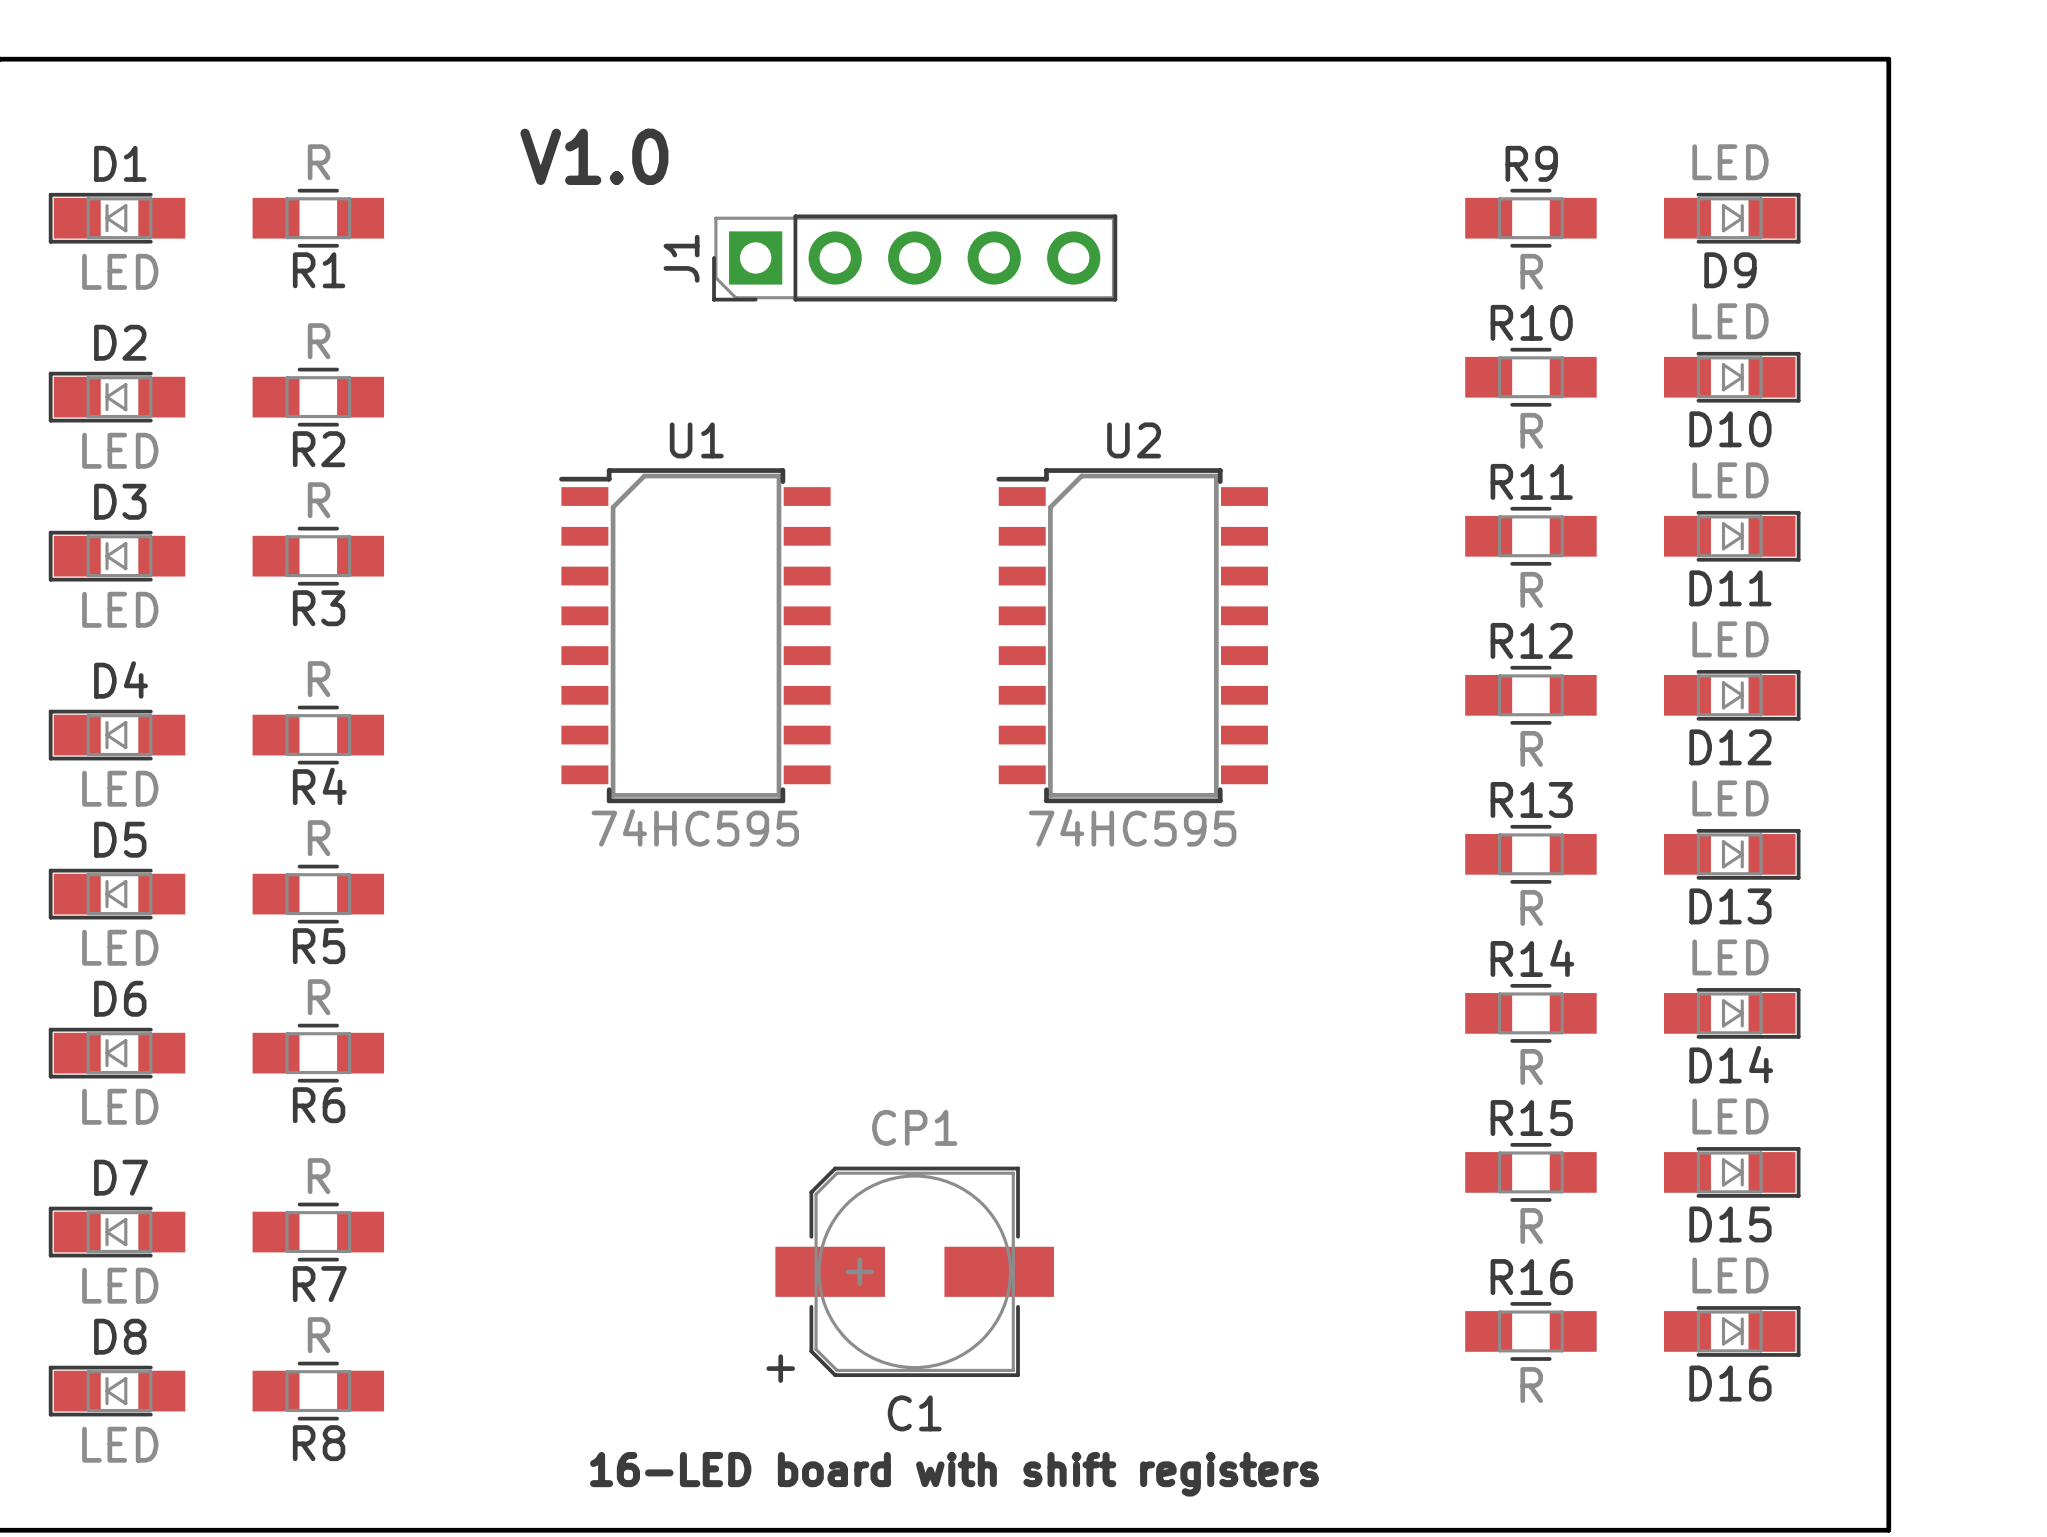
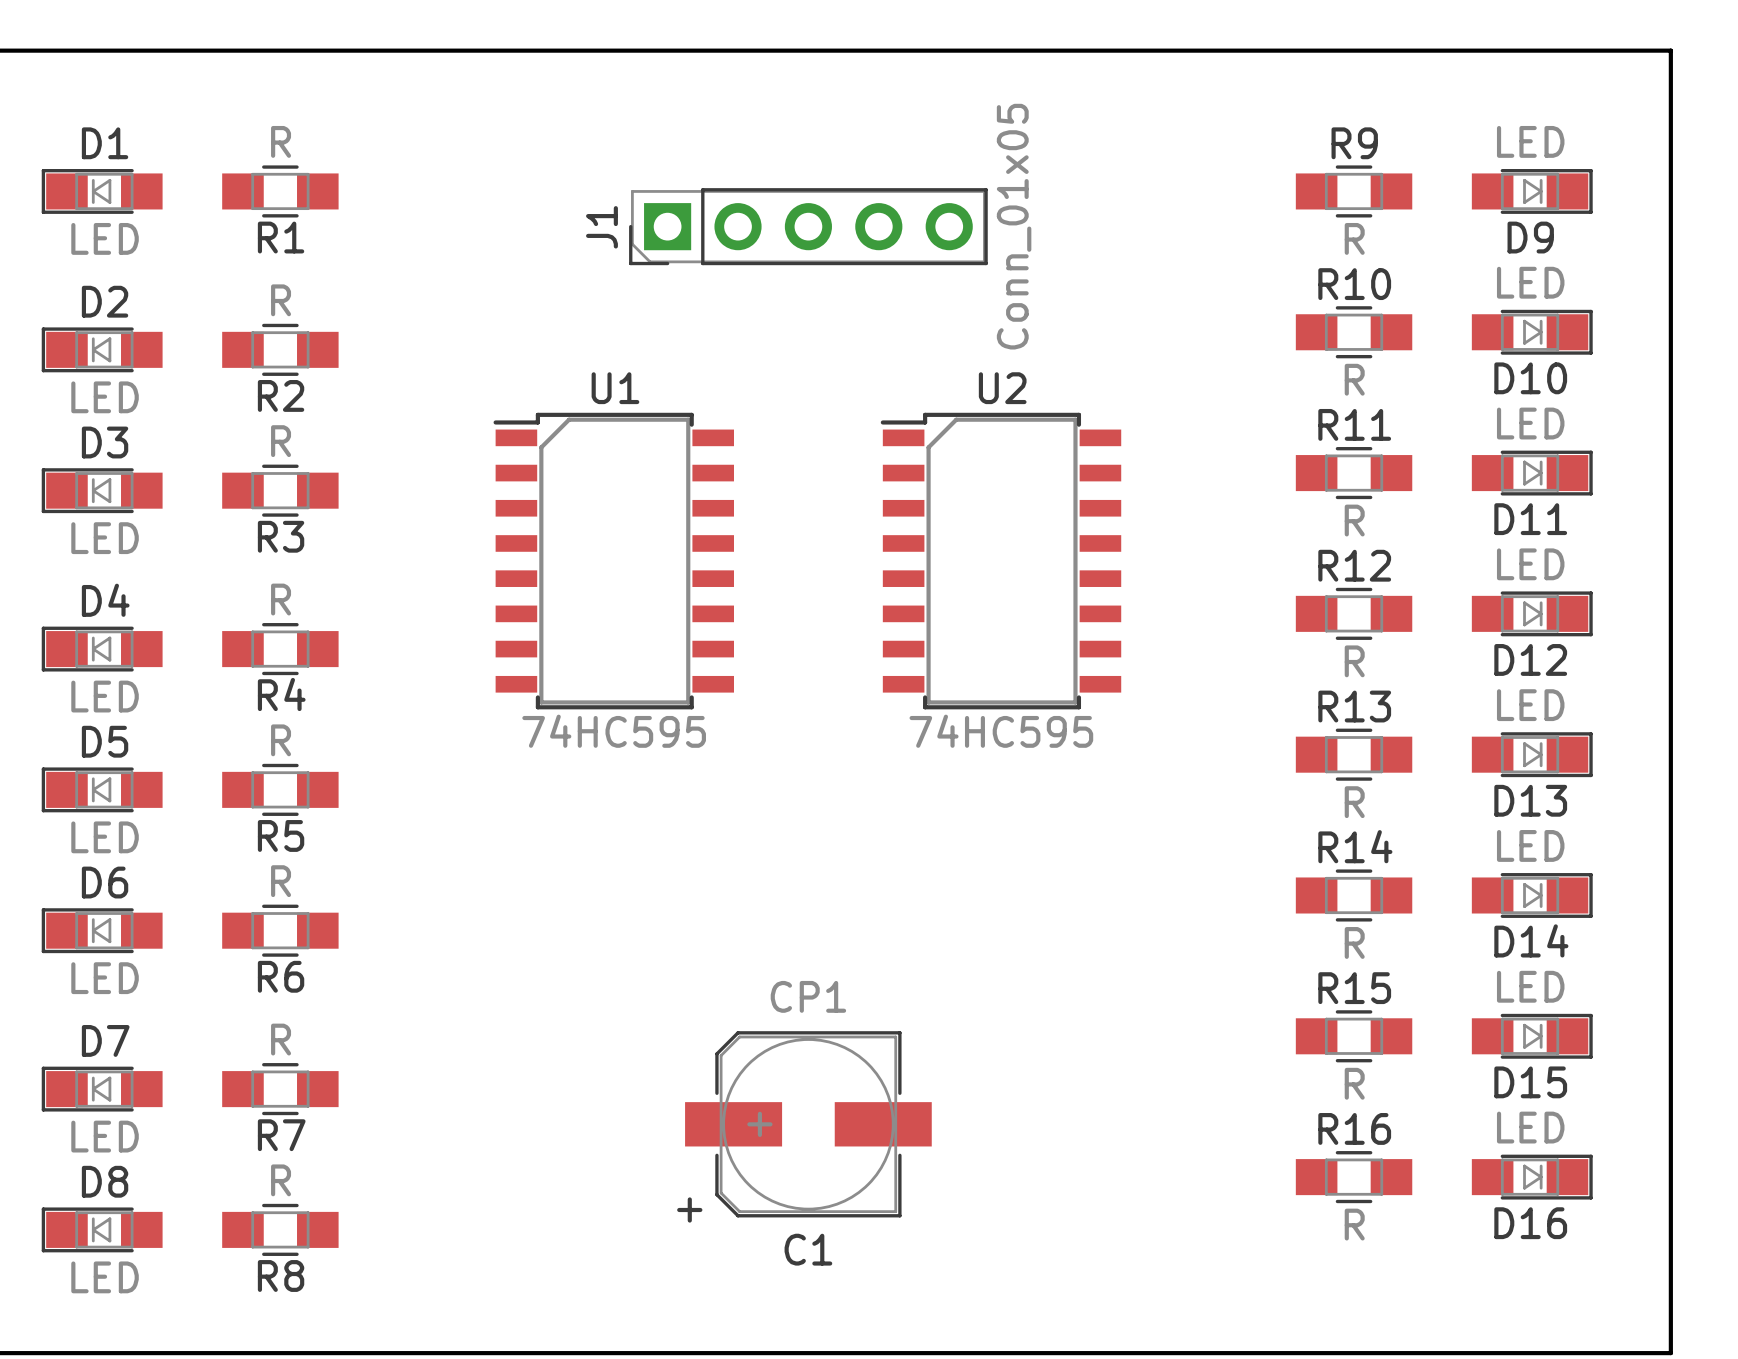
text: V1.0 (594, 156) -> none
J1 value: none -> Conn_01x05 (1014, 226)
text: 16-LED board with shift registers (954, 1474) -> none

